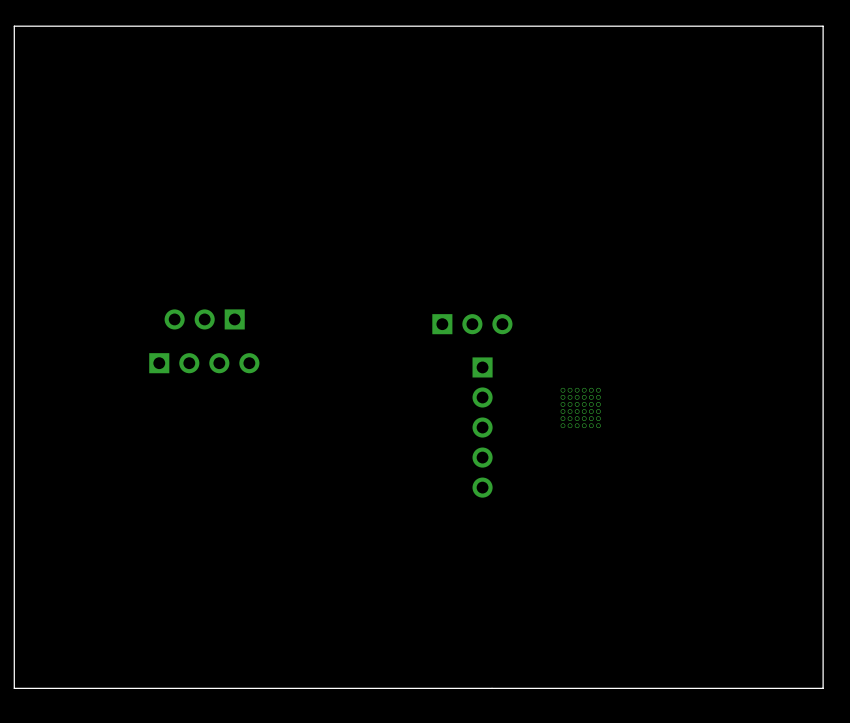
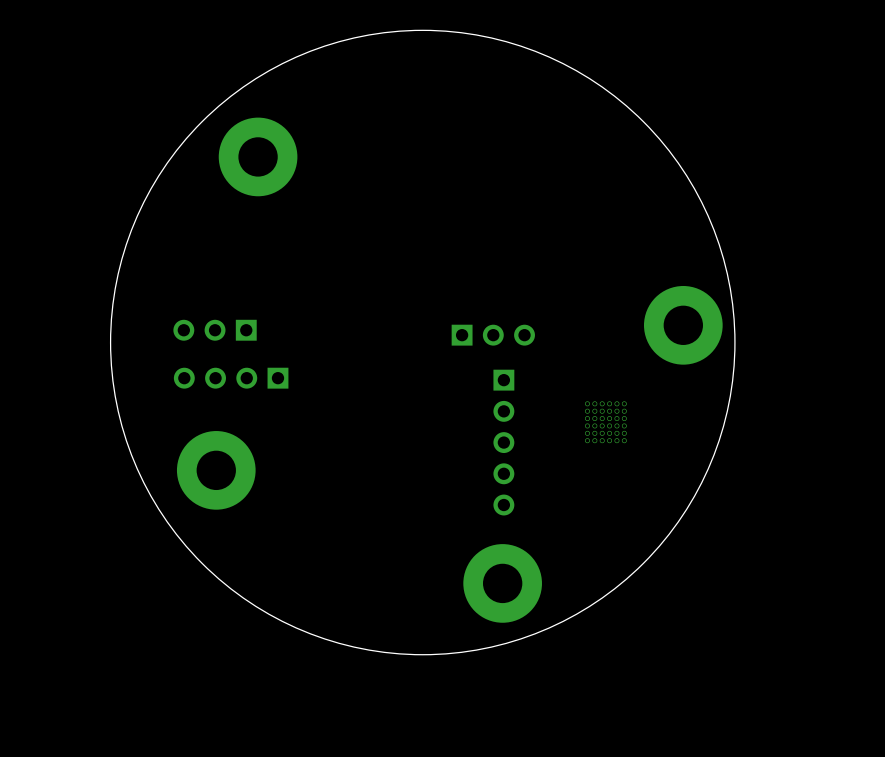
board edge: (823, 26) (14, 26) (14, 688) (823, 688) (823, 26) -> none
round board edge: none -> [110, 30, 736, 656]
part: none -> (258, 156)
part: none -> (683, 325)
part rotation: 0° (204, 363) -> 180° (231, 378)
part: none -> (216, 470)
part: none -> (502, 583)

